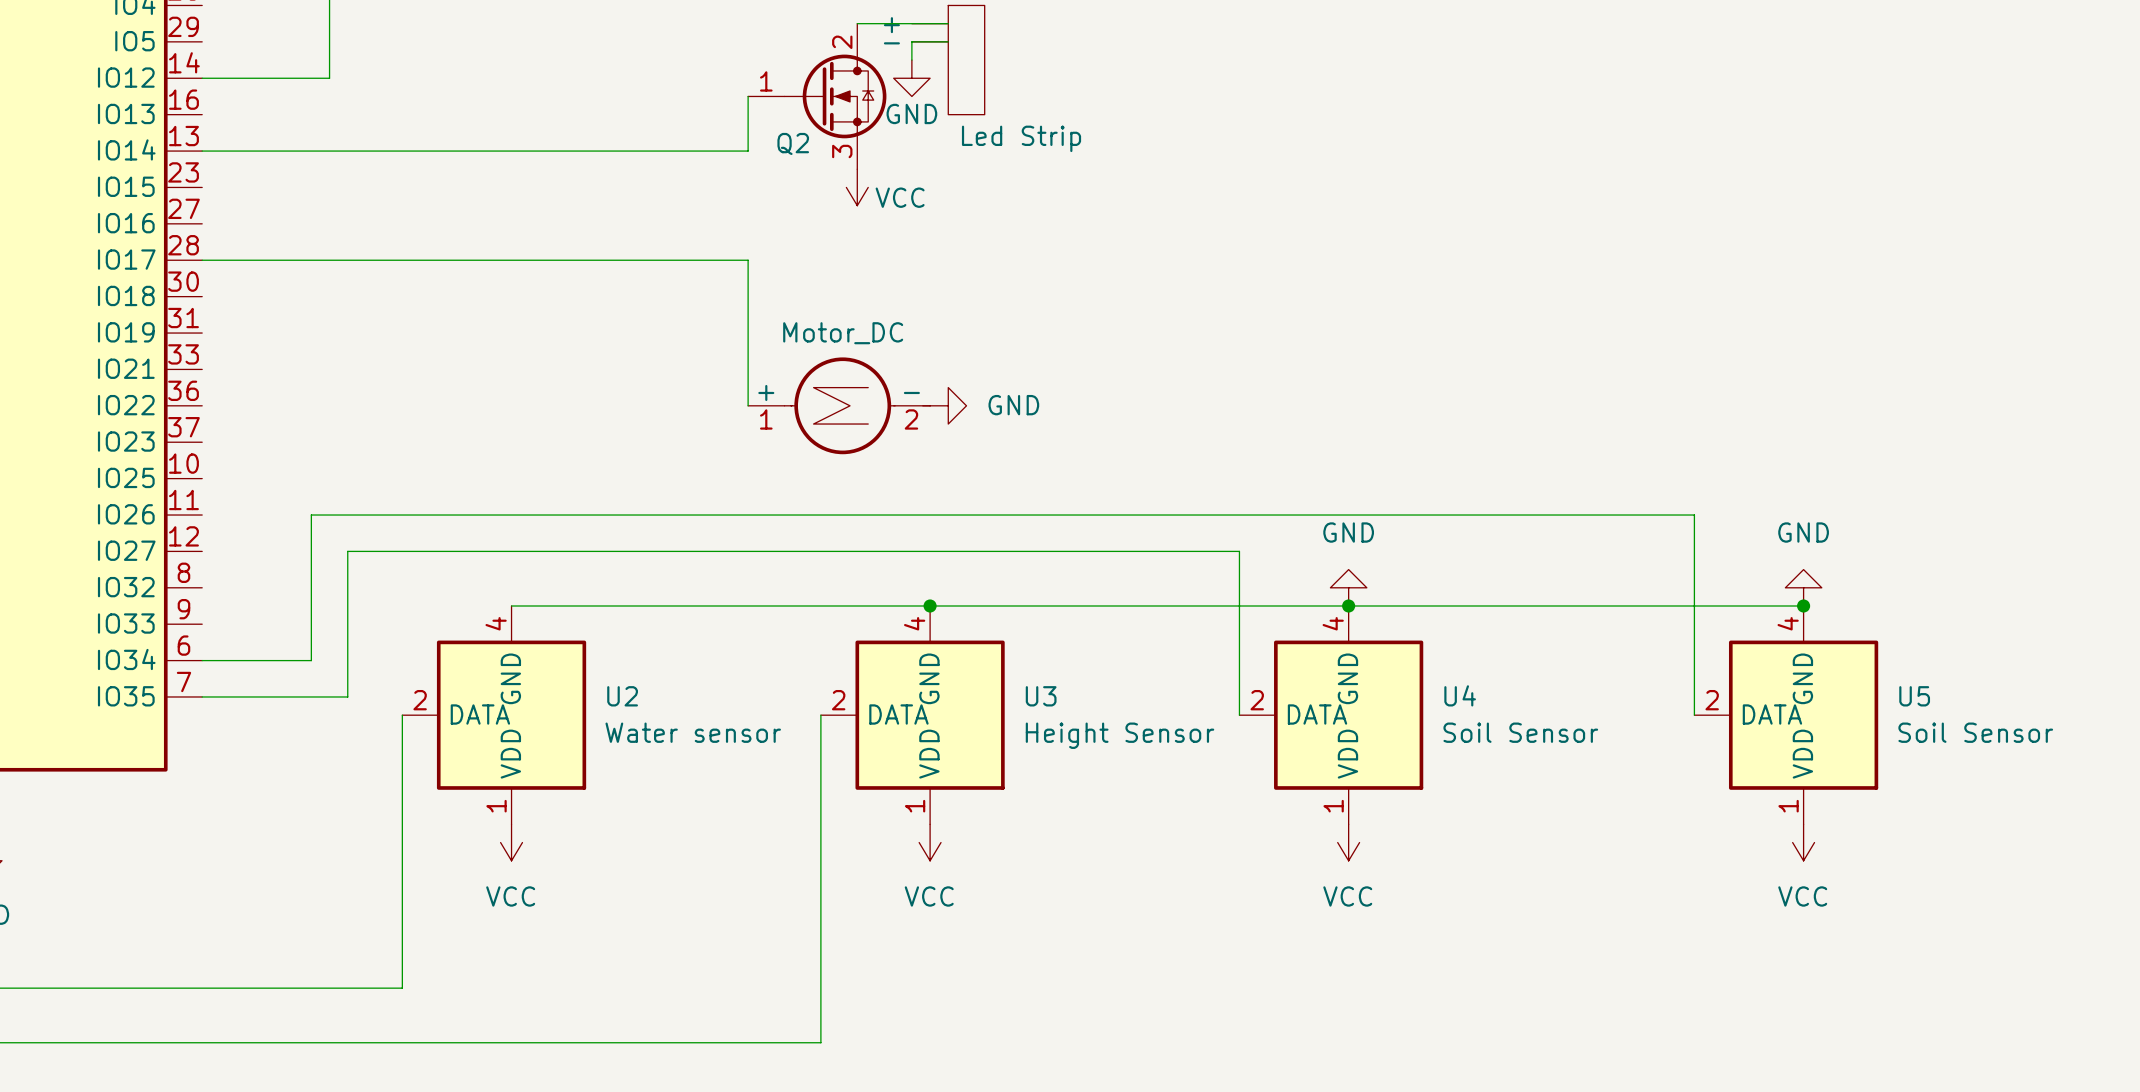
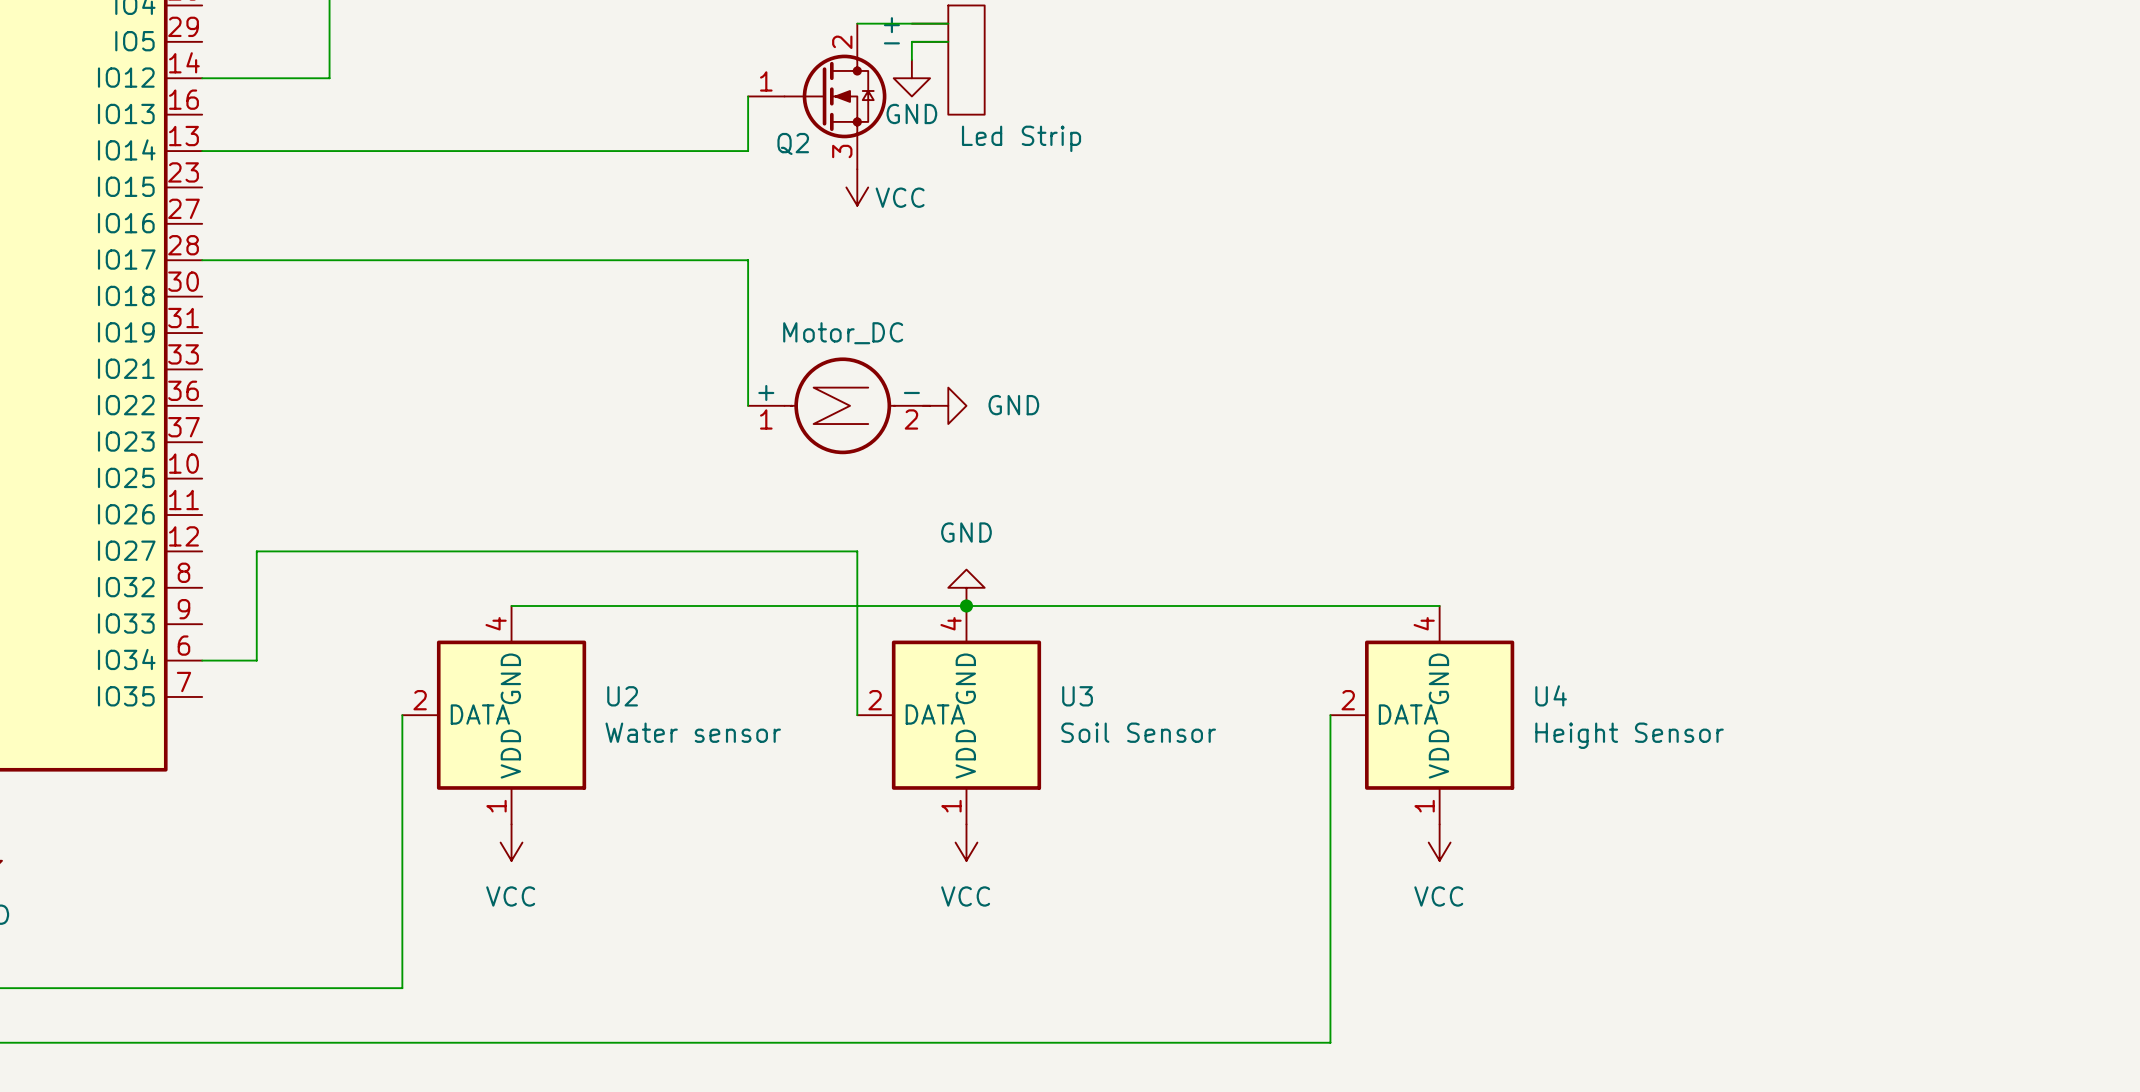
wire: (347, 551) (347, 696) (202, 696) -> (347, 551) (256, 551) (256, 660)
wire: (857, 551) (1239, 551) (1239, 715) -> (857, 551) (857, 715)
power symbol: none -> GND (966, 587)
power symbol: GND (1348, 587) -> none
power symbol: GND (1803, 587) -> none
junction position: (930, 606) -> (966, 606)
junction: (1348, 606) -> none
wire: (1439, 606) (1803, 606) -> none
junction: (1803, 606) -> none
wire: (256, 660) (311, 660) (311, 515) (1694, 515) (1694, 715) -> none
wire: (820, 715) (820, 1042) -> (1330, 715) (1330, 1042) (820, 1042)
U3 position: (912, 715) -> (949, 715)
U4 position: (1331, 715) -> (1422, 715)
U5: Soil Sensor (1786, 715) -> none
U4 value: Soil Sensor (1520, 732) -> Height Sensor (1629, 735)
U3 value: Height Sensor (1120, 735) -> Soil Sensor (1138, 732)
power symbol position: VCC (930, 842) -> VCC (966, 842)
power symbol position: VCC (1348, 842) -> VCC (1439, 842)
power symbol: VCC (1803, 842) -> none

